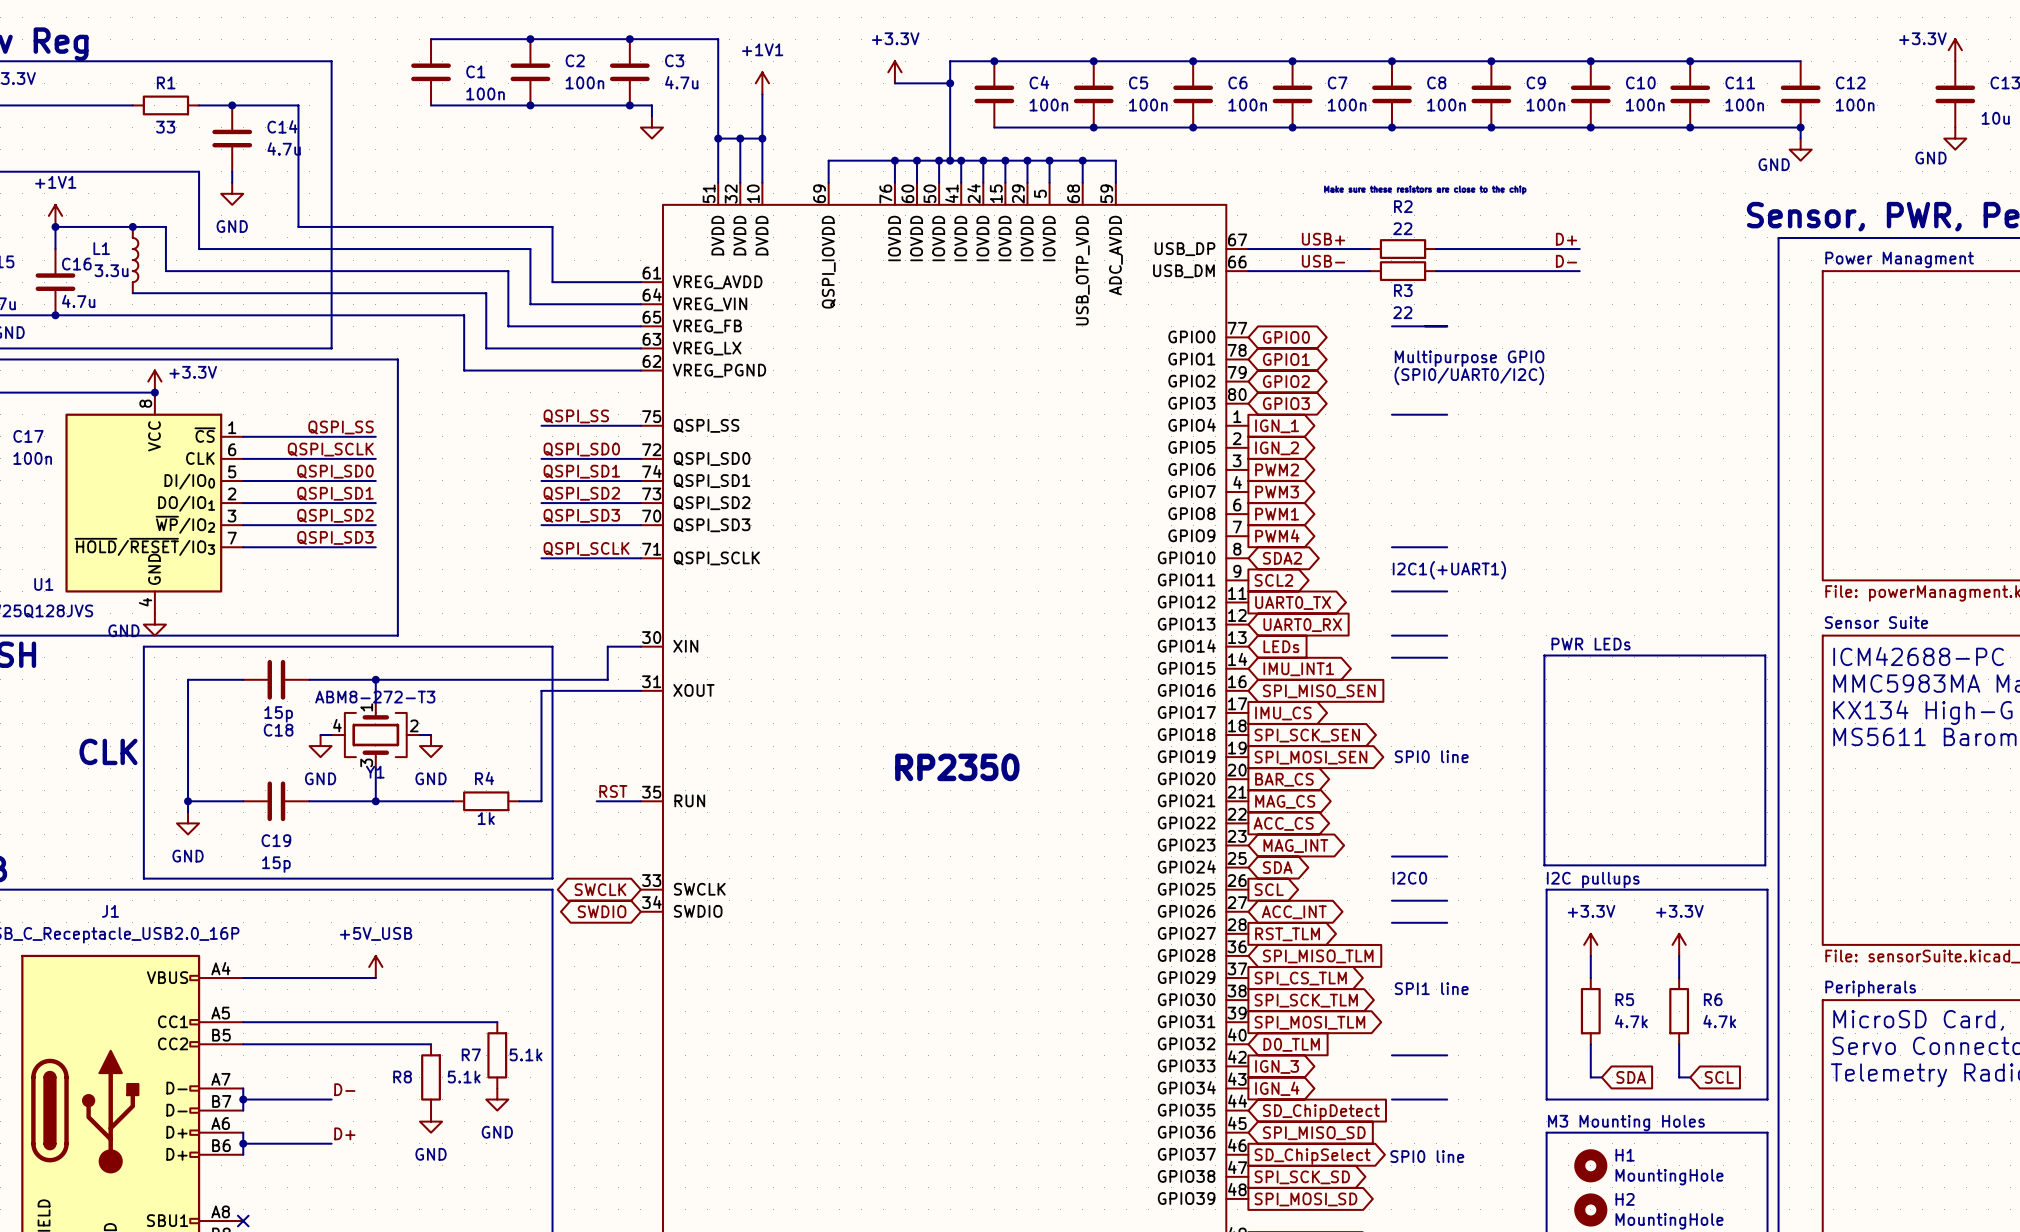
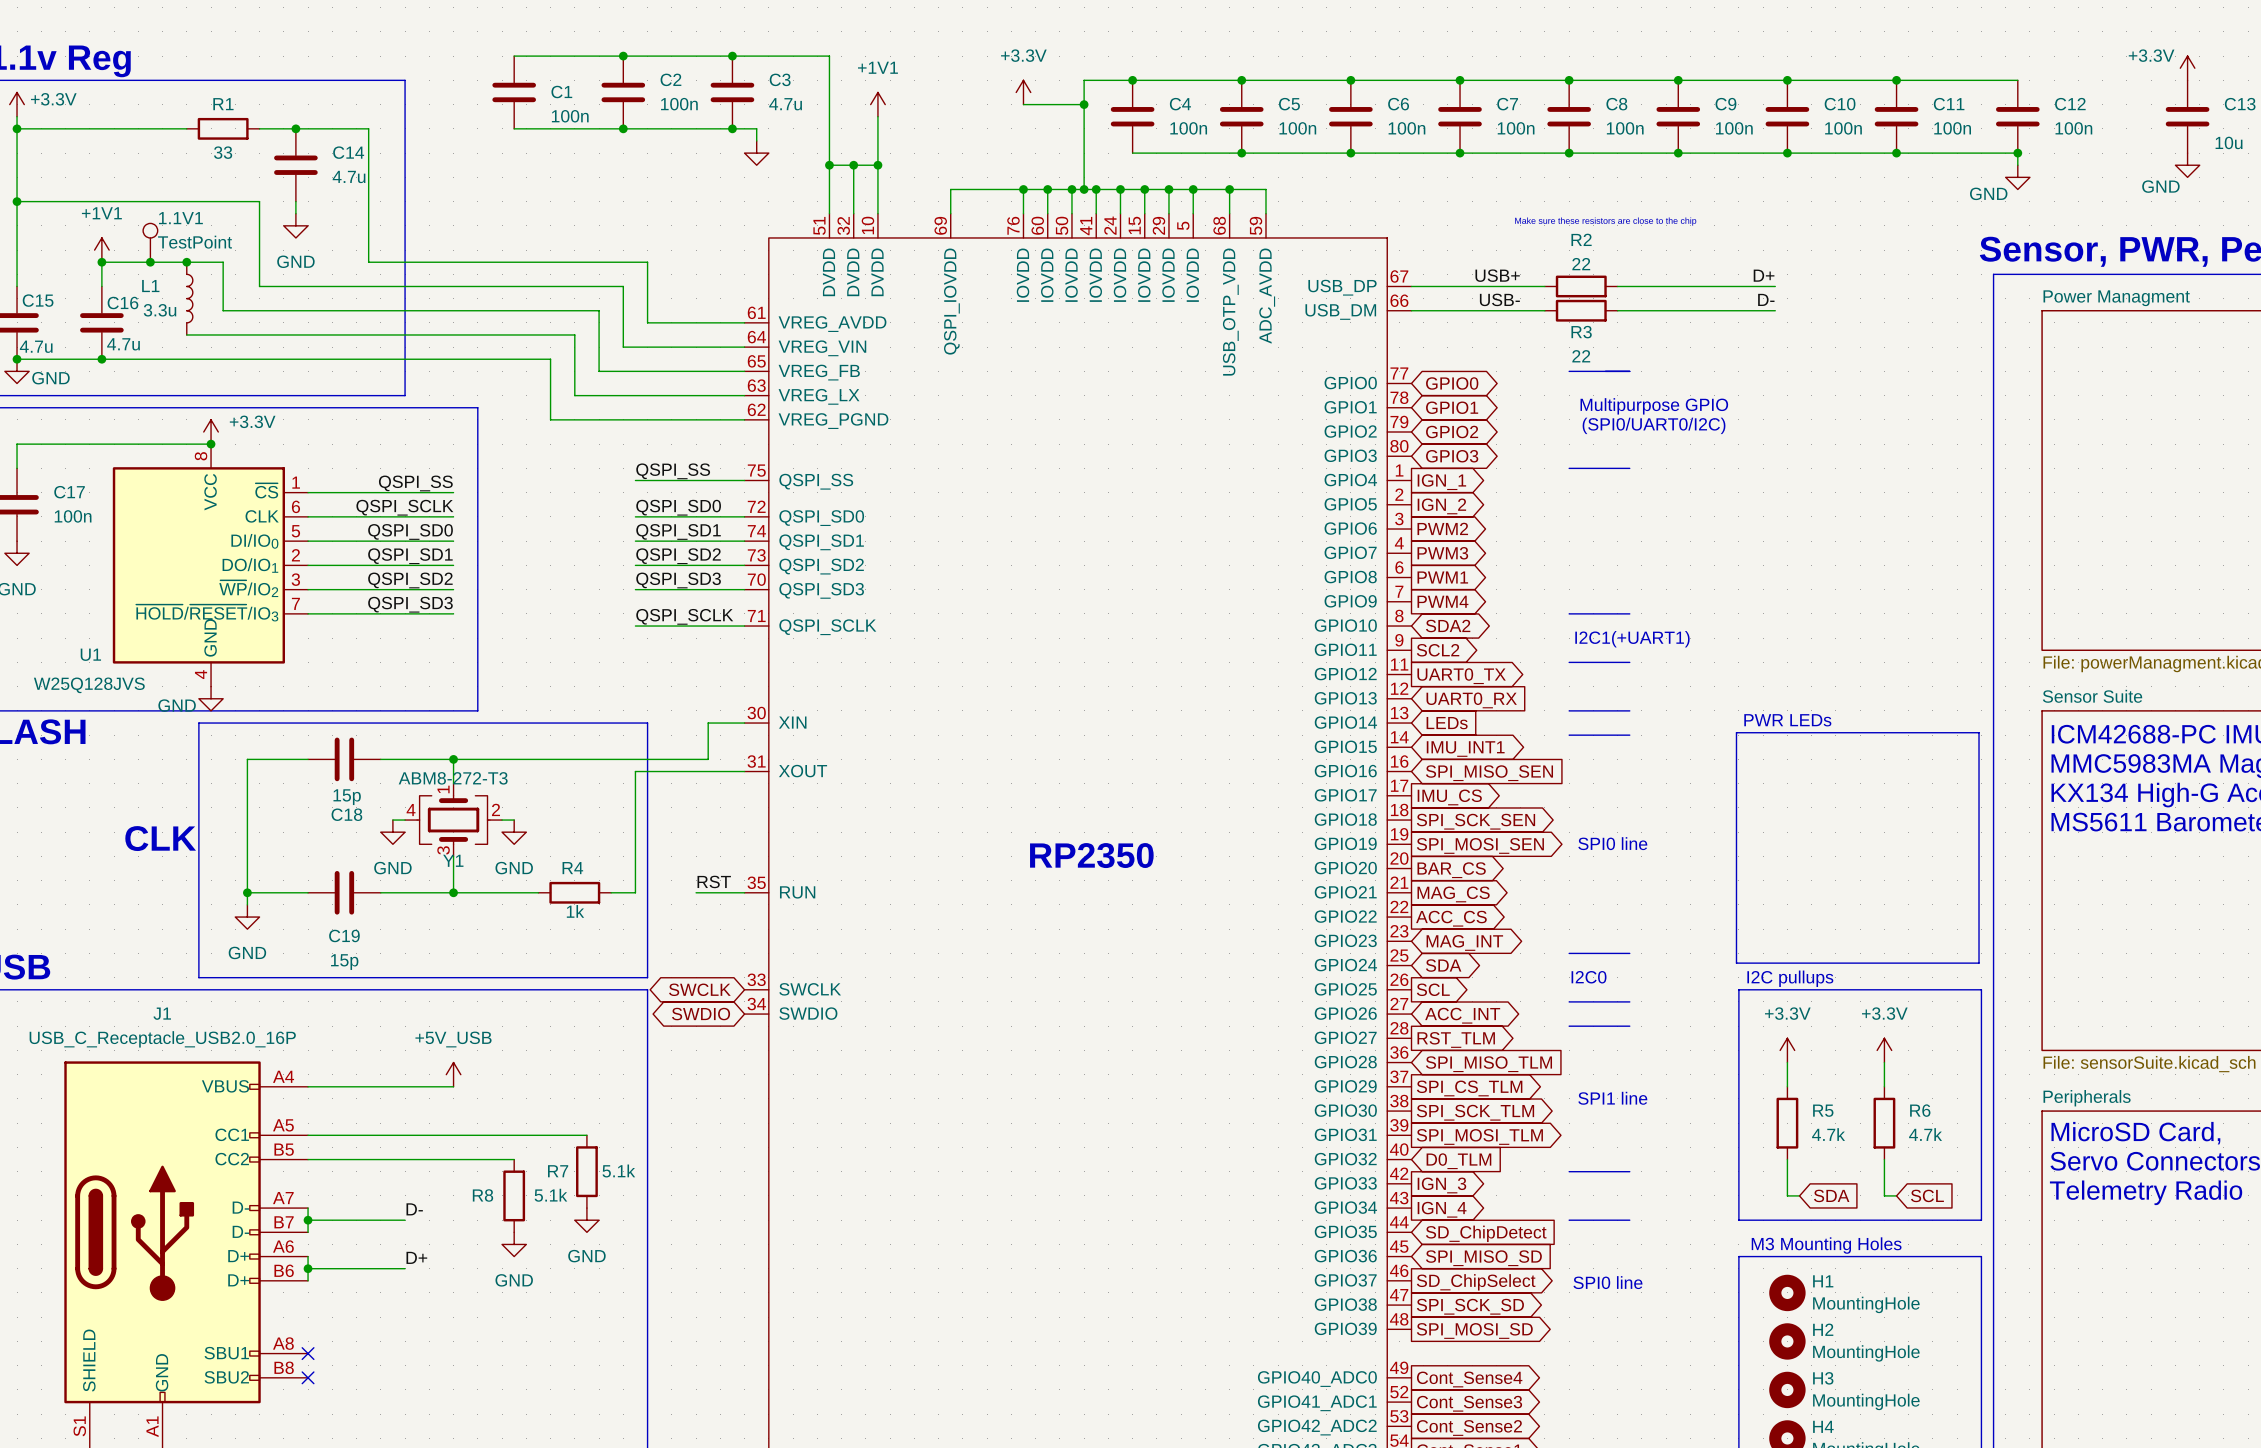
1.1V1: none -> TestPoint (150, 242)
junction: none -> (150, 262)

